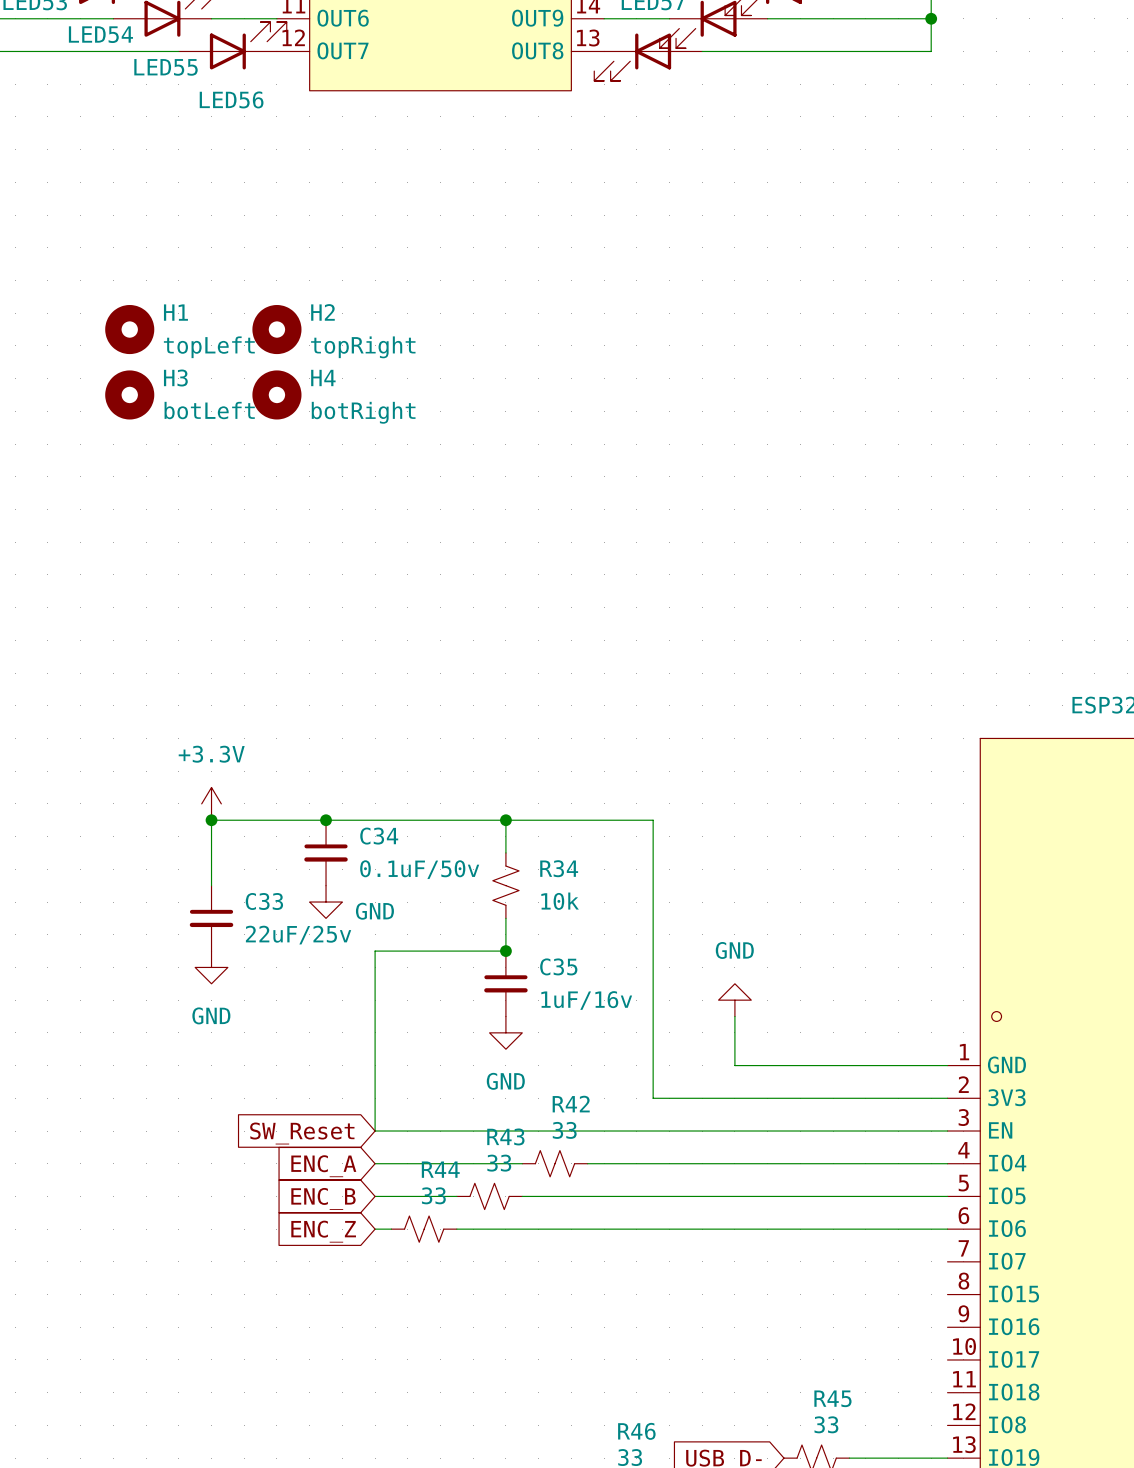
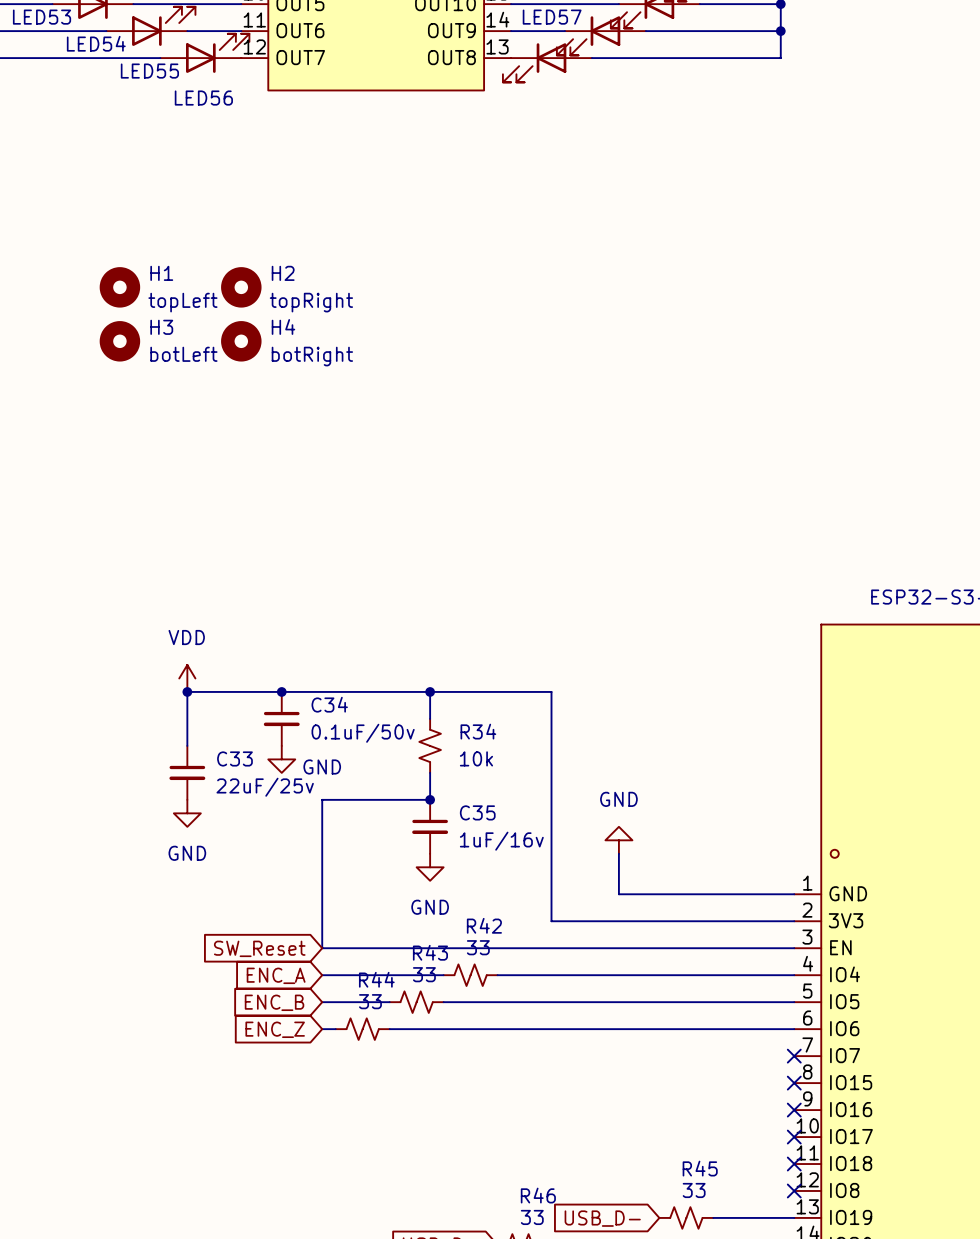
power symbol: +3.3V (211, 803) -> VDD (187, 678)
no-connect mark: none -> (794, 1056)
no-connect mark: none -> (794, 1083)
no-connect mark: none -> (794, 1110)
no-connect mark: none -> (794, 1137)
no-connect mark: none -> (794, 1164)
no-connect mark: none -> (794, 1190)

